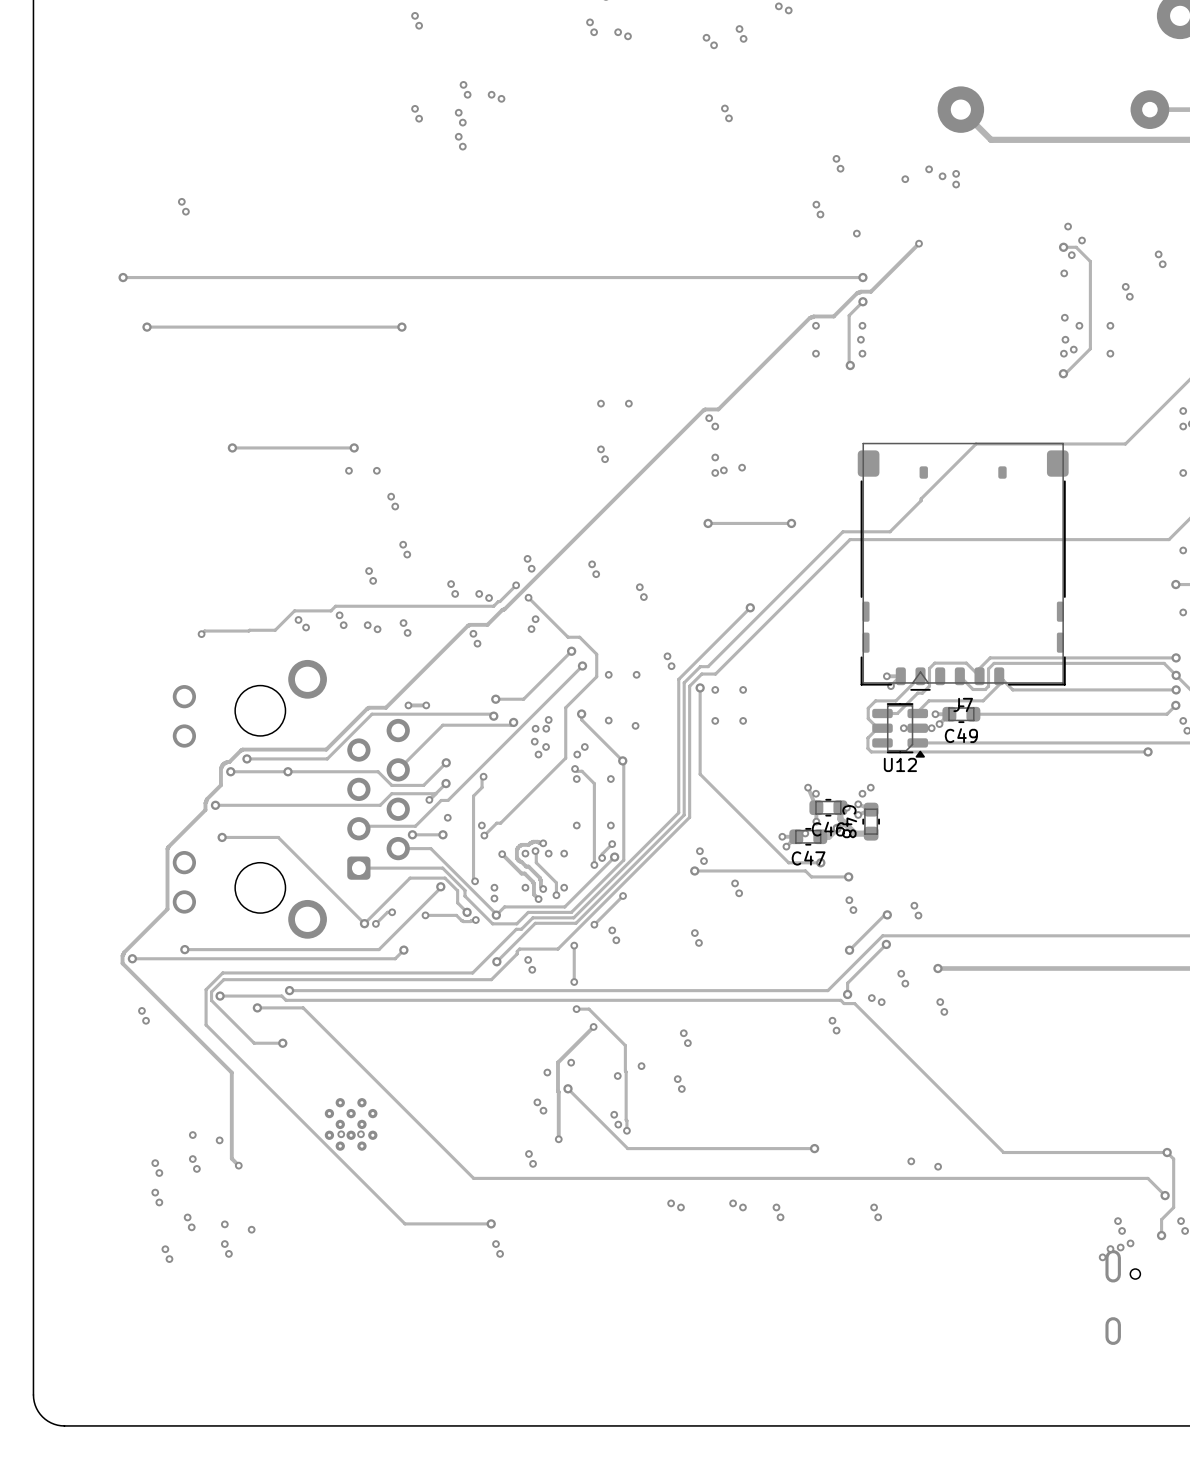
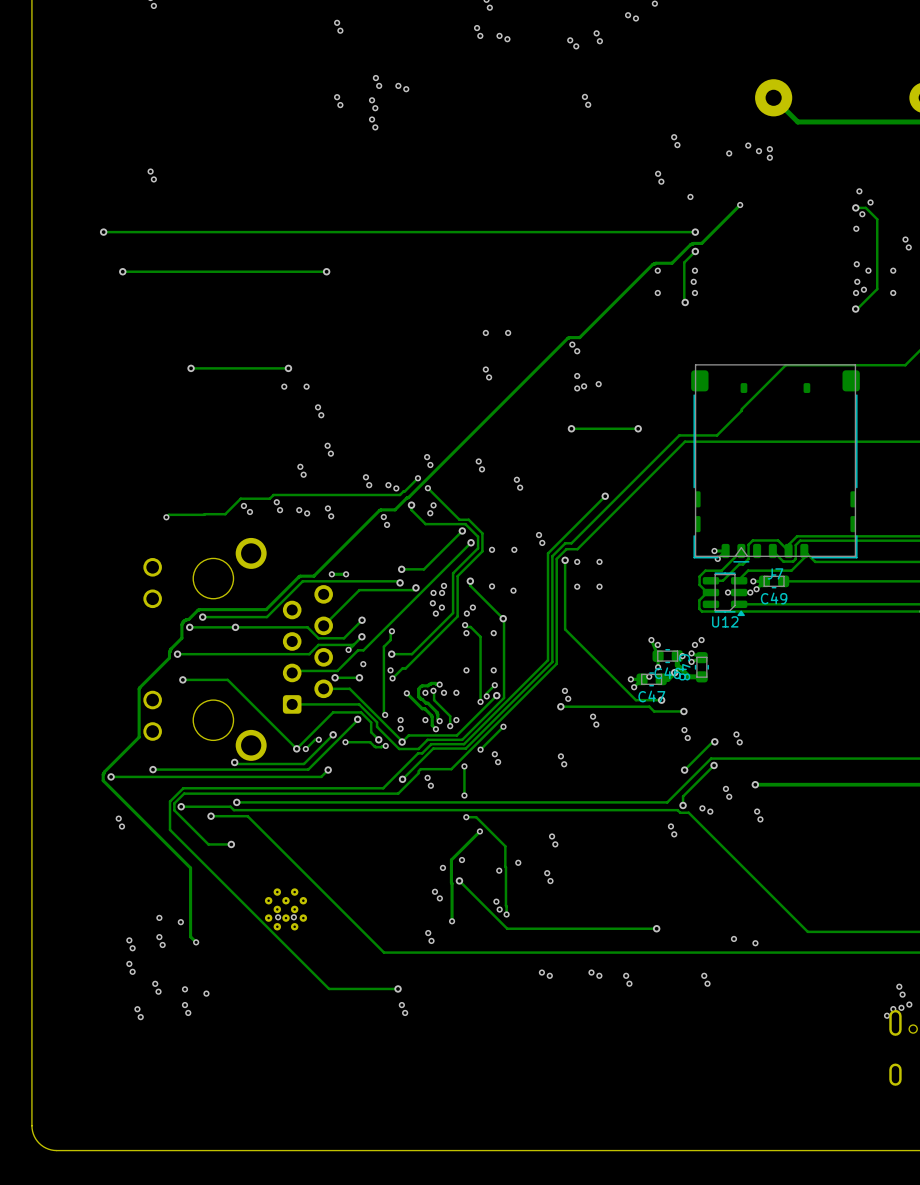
track: none -> (411, 505) (411, 510) (425, 524) (465, 524) (478, 536) (478, 548) (453, 573) (453, 613) (411, 654) (391, 654)
via: none -> (411, 505)
via: none -> (391, 654)
track: none -> (333, 734) (303, 763) (236, 763) (234, 762)
via: none -> (333, 734)
via: none -> (234, 762)

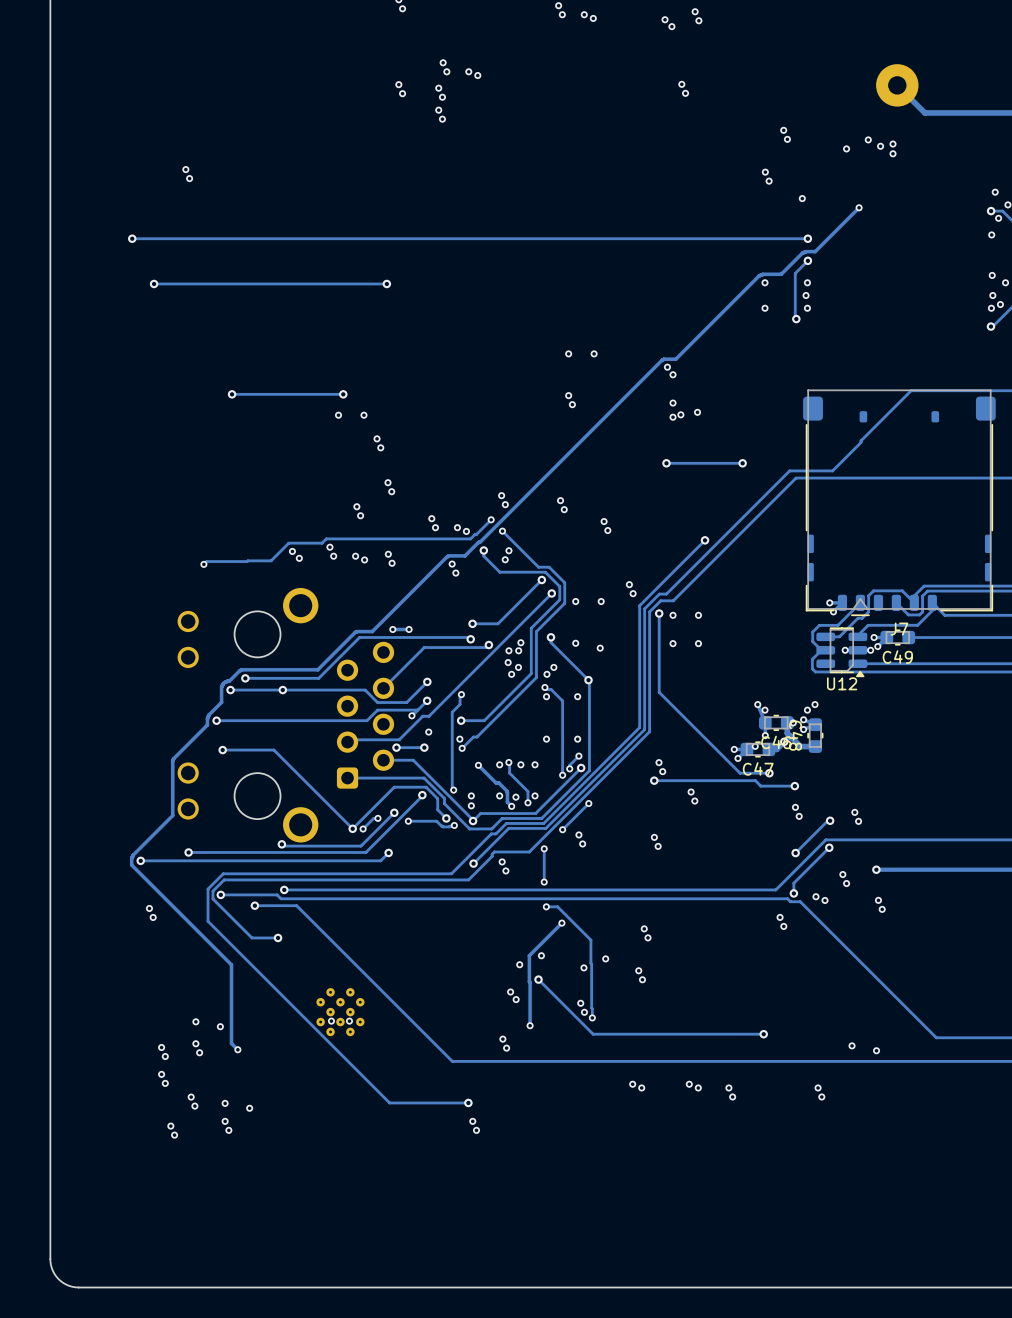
track: (439, 684) (431, 683) (422, 685) (418, 689) (419, 697) (437, 712) (439, 721) -> none
via: (439, 684) -> none

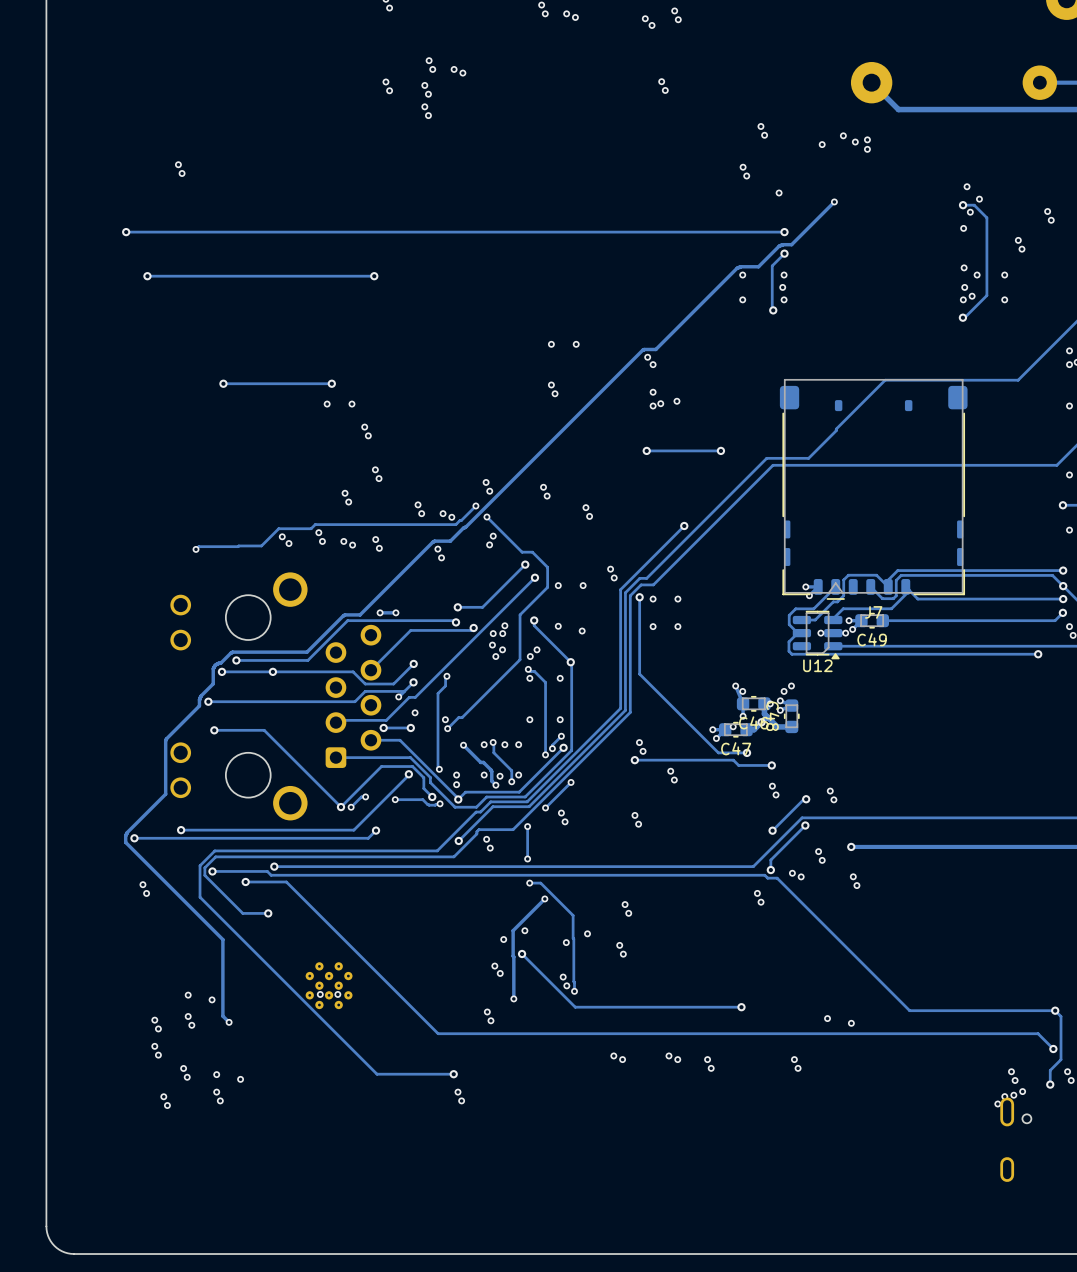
track: (483, 550) (483, 556) (499, 572) (545, 572) (559, 586) (559, 599) (531, 628) (531, 673) (484, 720) (461, 720) -> none
via: (483, 550) -> none
via: (461, 720) -> none
track: (394, 812) (361, 846) (283, 846) (281, 844) -> none
via: (394, 812) -> none
via: (281, 844) -> none

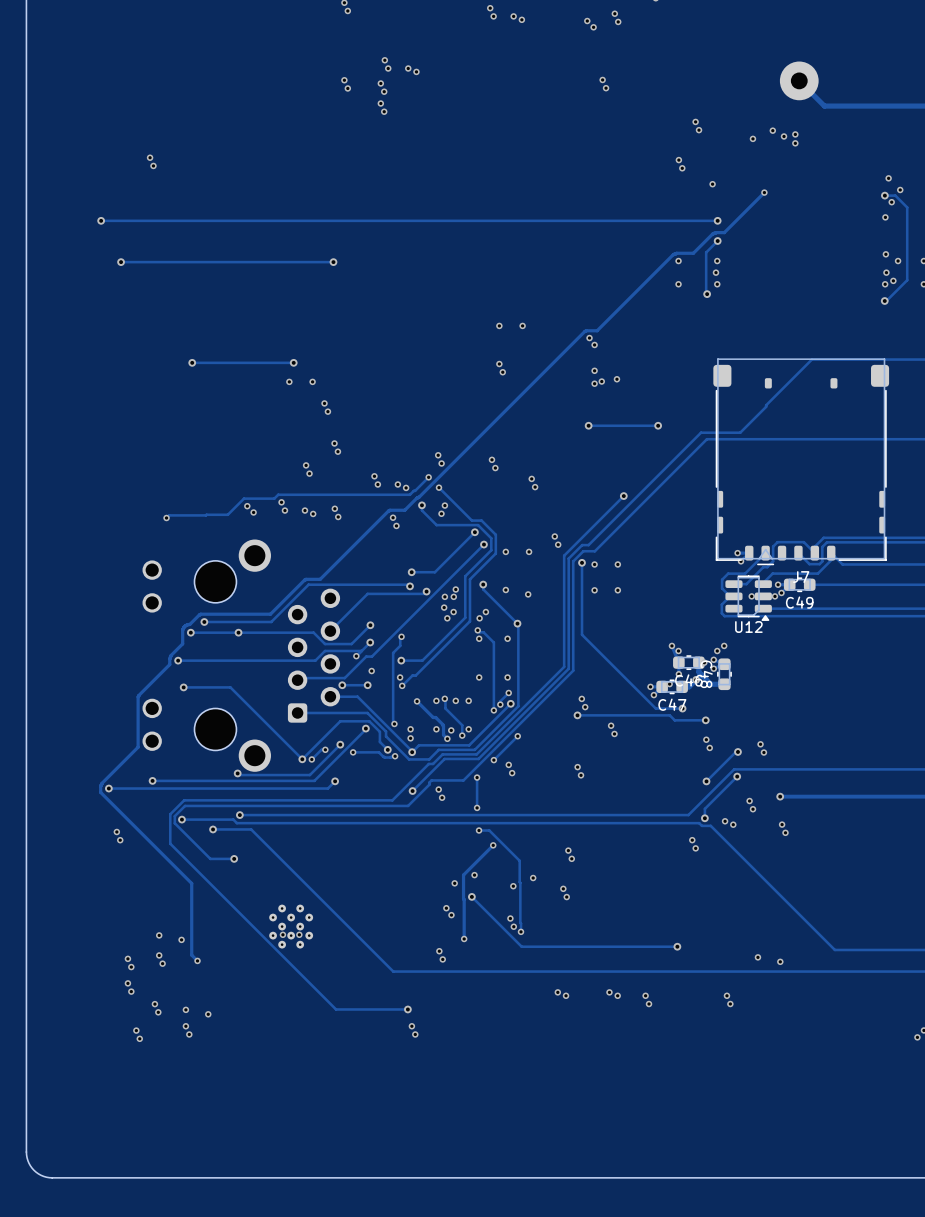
track: none -> (421, 505) (421, 510) (436, 525) (478, 525) (491, 538) (491, 550) (465, 576) (465, 617) (422, 660) (401, 660)
via: none -> (421, 505)
via: (380, 612) -> none
track: (395, 612) (380, 612) -> none
via: (395, 612) -> none
via: none -> (401, 660)
track: none -> (340, 744) (309, 775) (239, 775) (237, 773)
via: none -> (340, 744)
via: none -> (237, 773)

